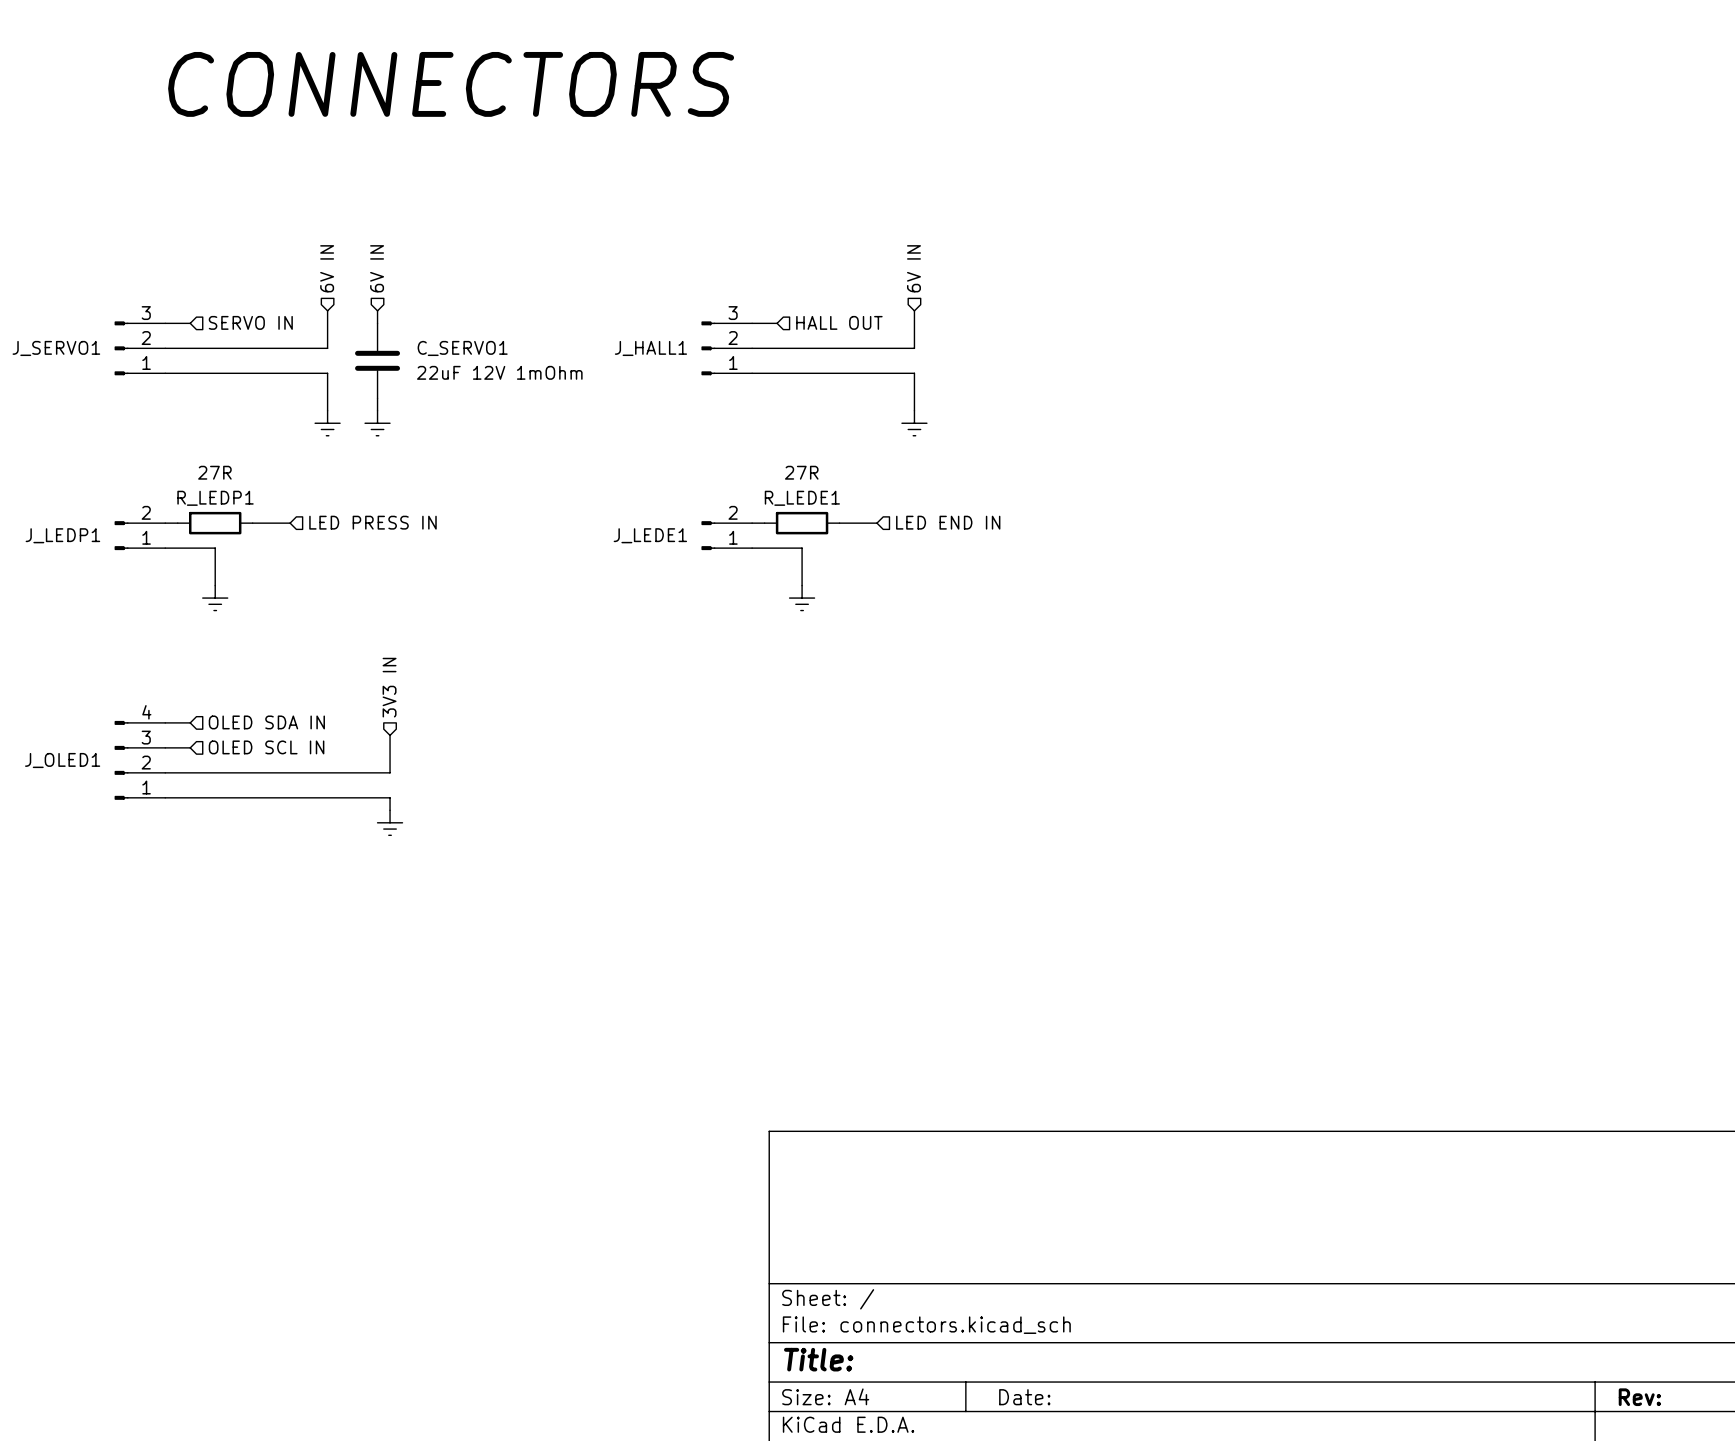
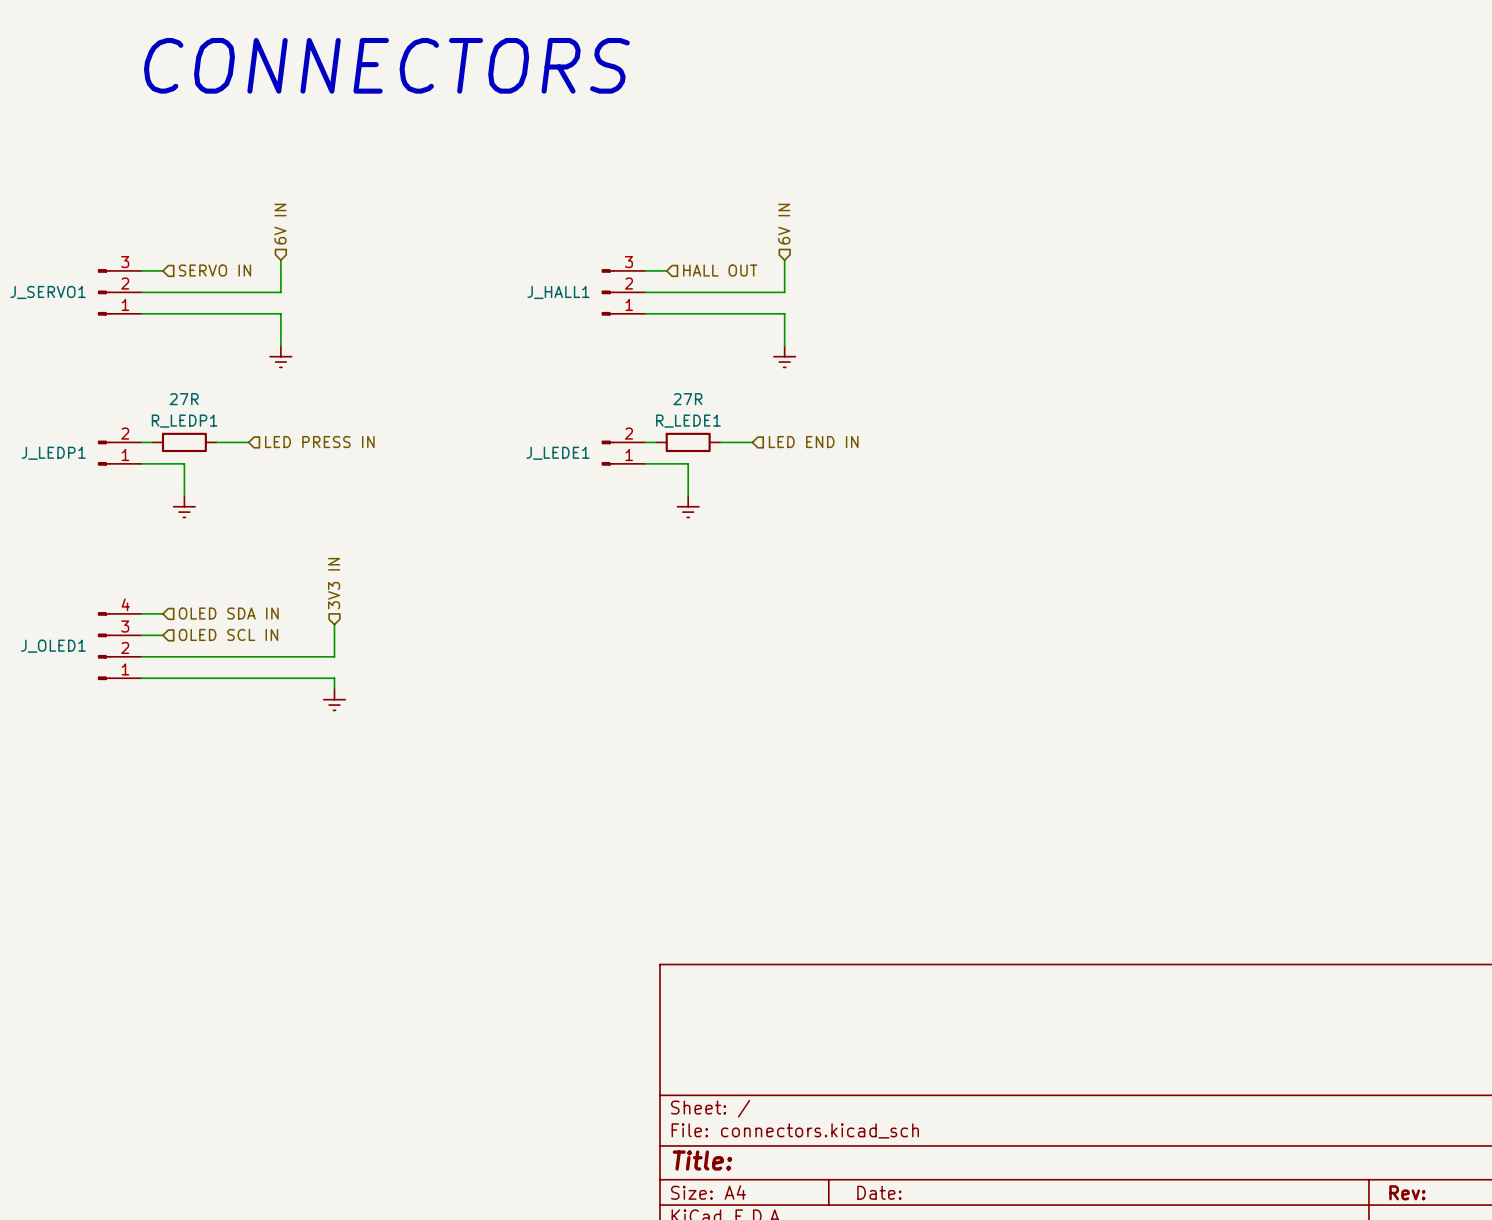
hierarchical label: 6V IN (377, 268) -> none
wire: (377, 310) (377, 323) -> none
C_SERVO1: 22uF 12V 1mOhm (377, 360) -> none
wire: (377, 398) (377, 410) -> none
power symbol: (377, 423) -> none

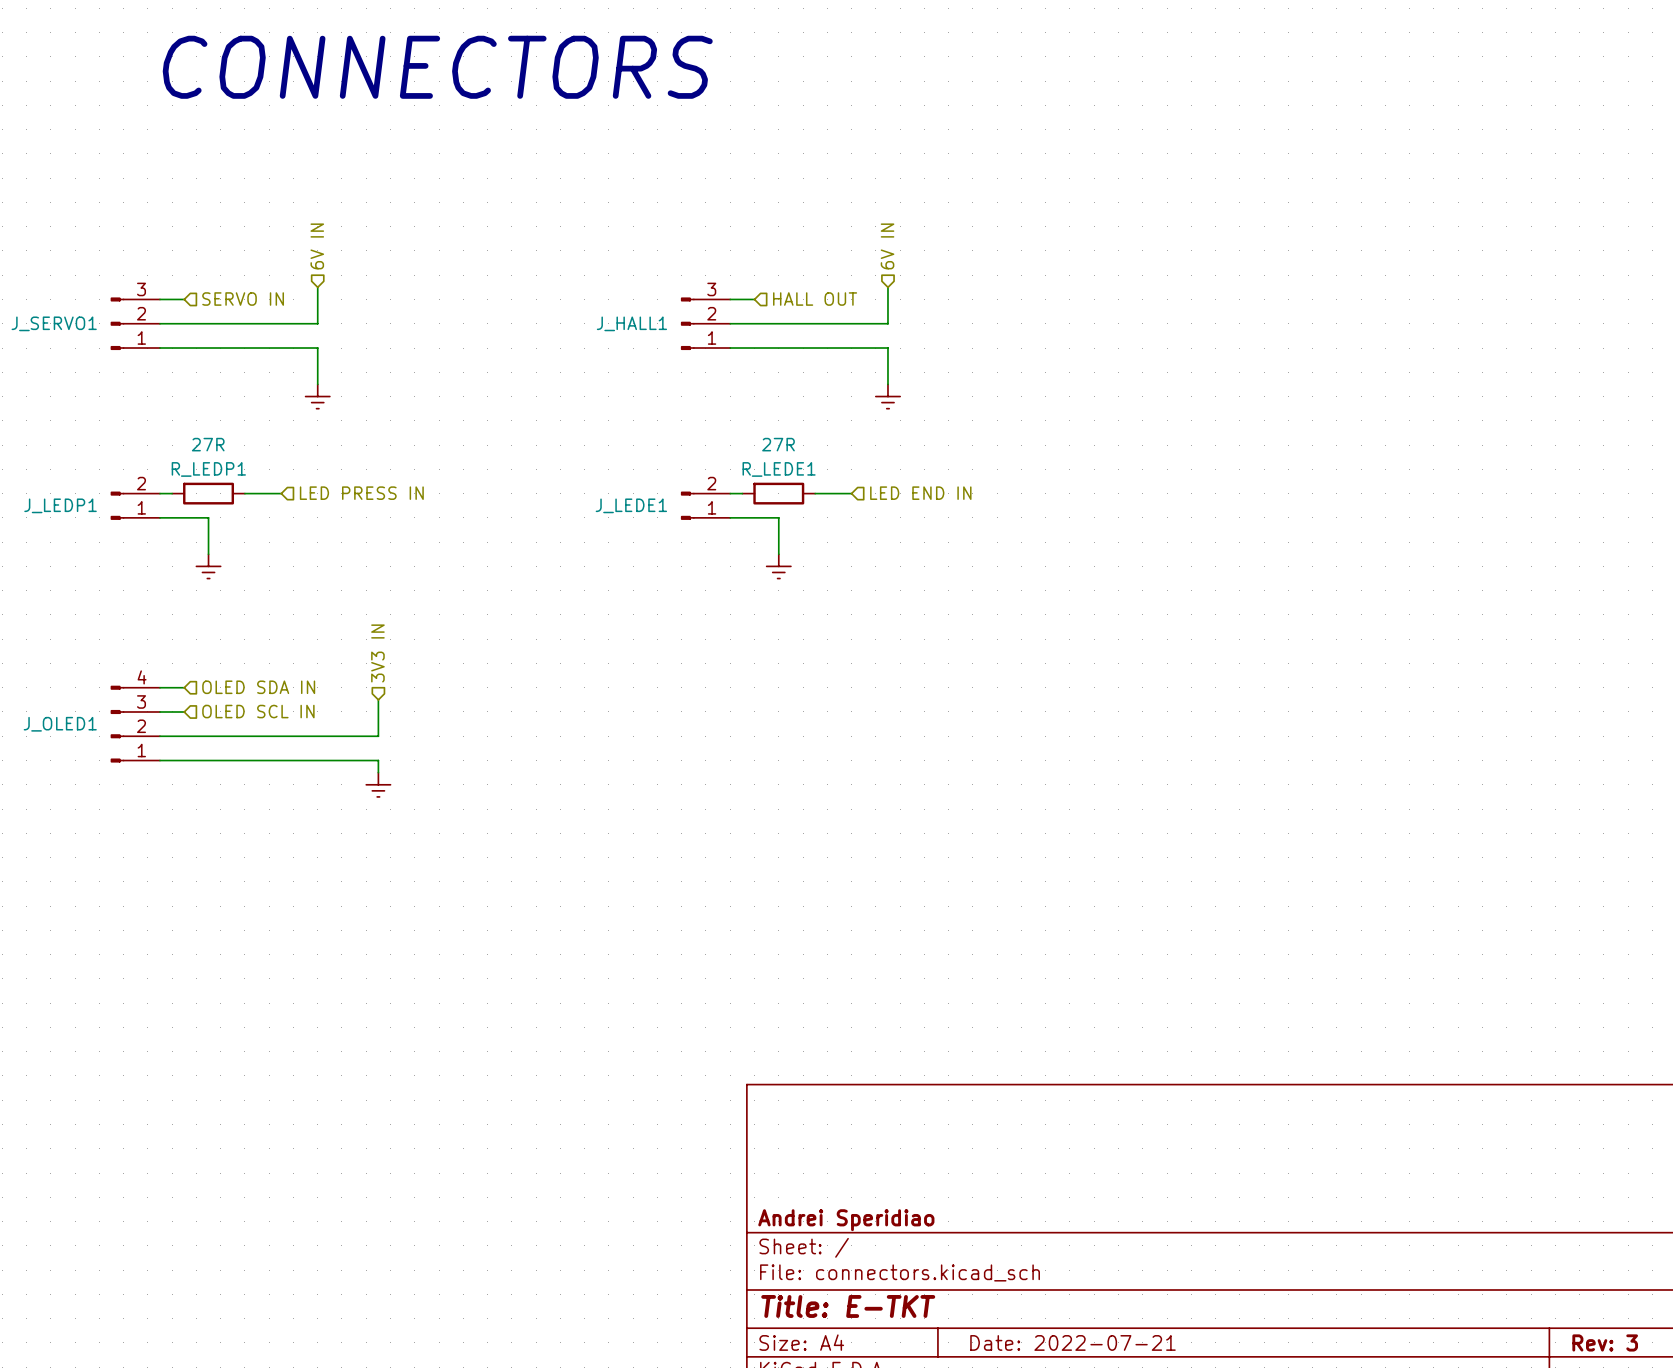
title block: none -> Andrei Speridiao (846, 1220)
title block: Title: (702, 1160) -> Title: E-TKT (848, 1306)
title block: Date: (879, 1192) -> Date: 2022-07-21 (1073, 1342)
title block: Rev: (1407, 1192) -> Rev: 3 (1605, 1342)

